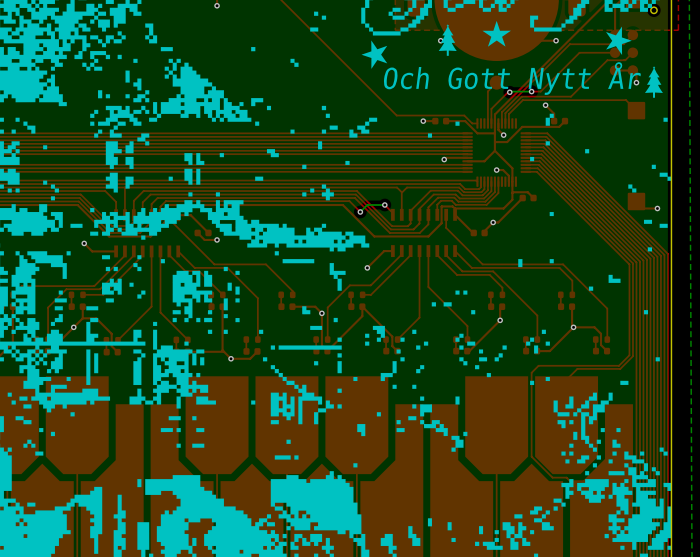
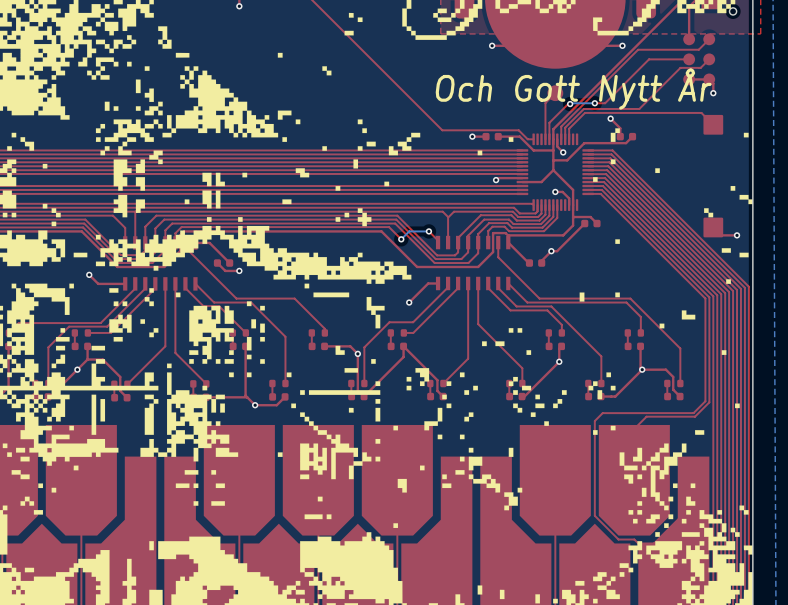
drawing: [482, 20, 511, 47] -> none
drawing: [438, 24, 457, 56] -> none
drawing: [606, 26, 632, 55] -> none
drawing: [361, 40, 388, 69] -> none
drawing: [644, 66, 663, 98] -> none

